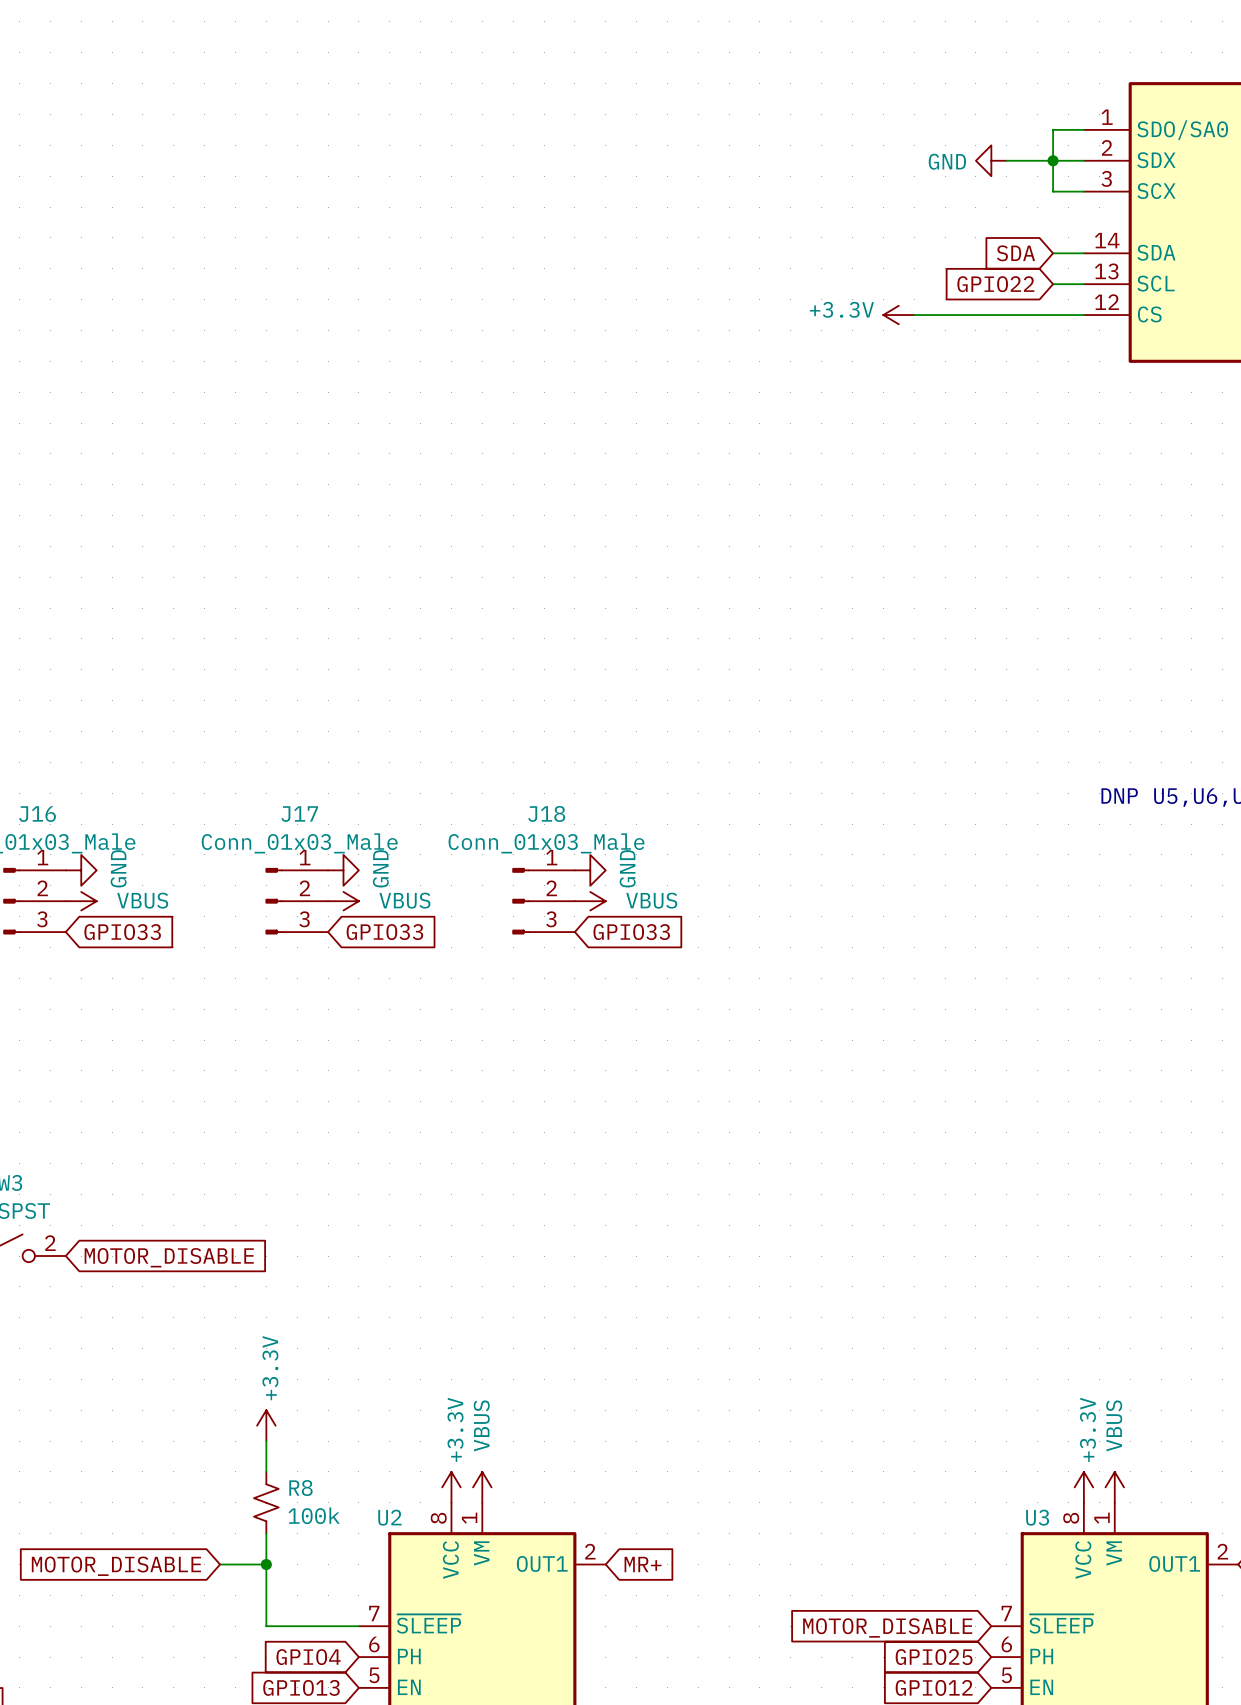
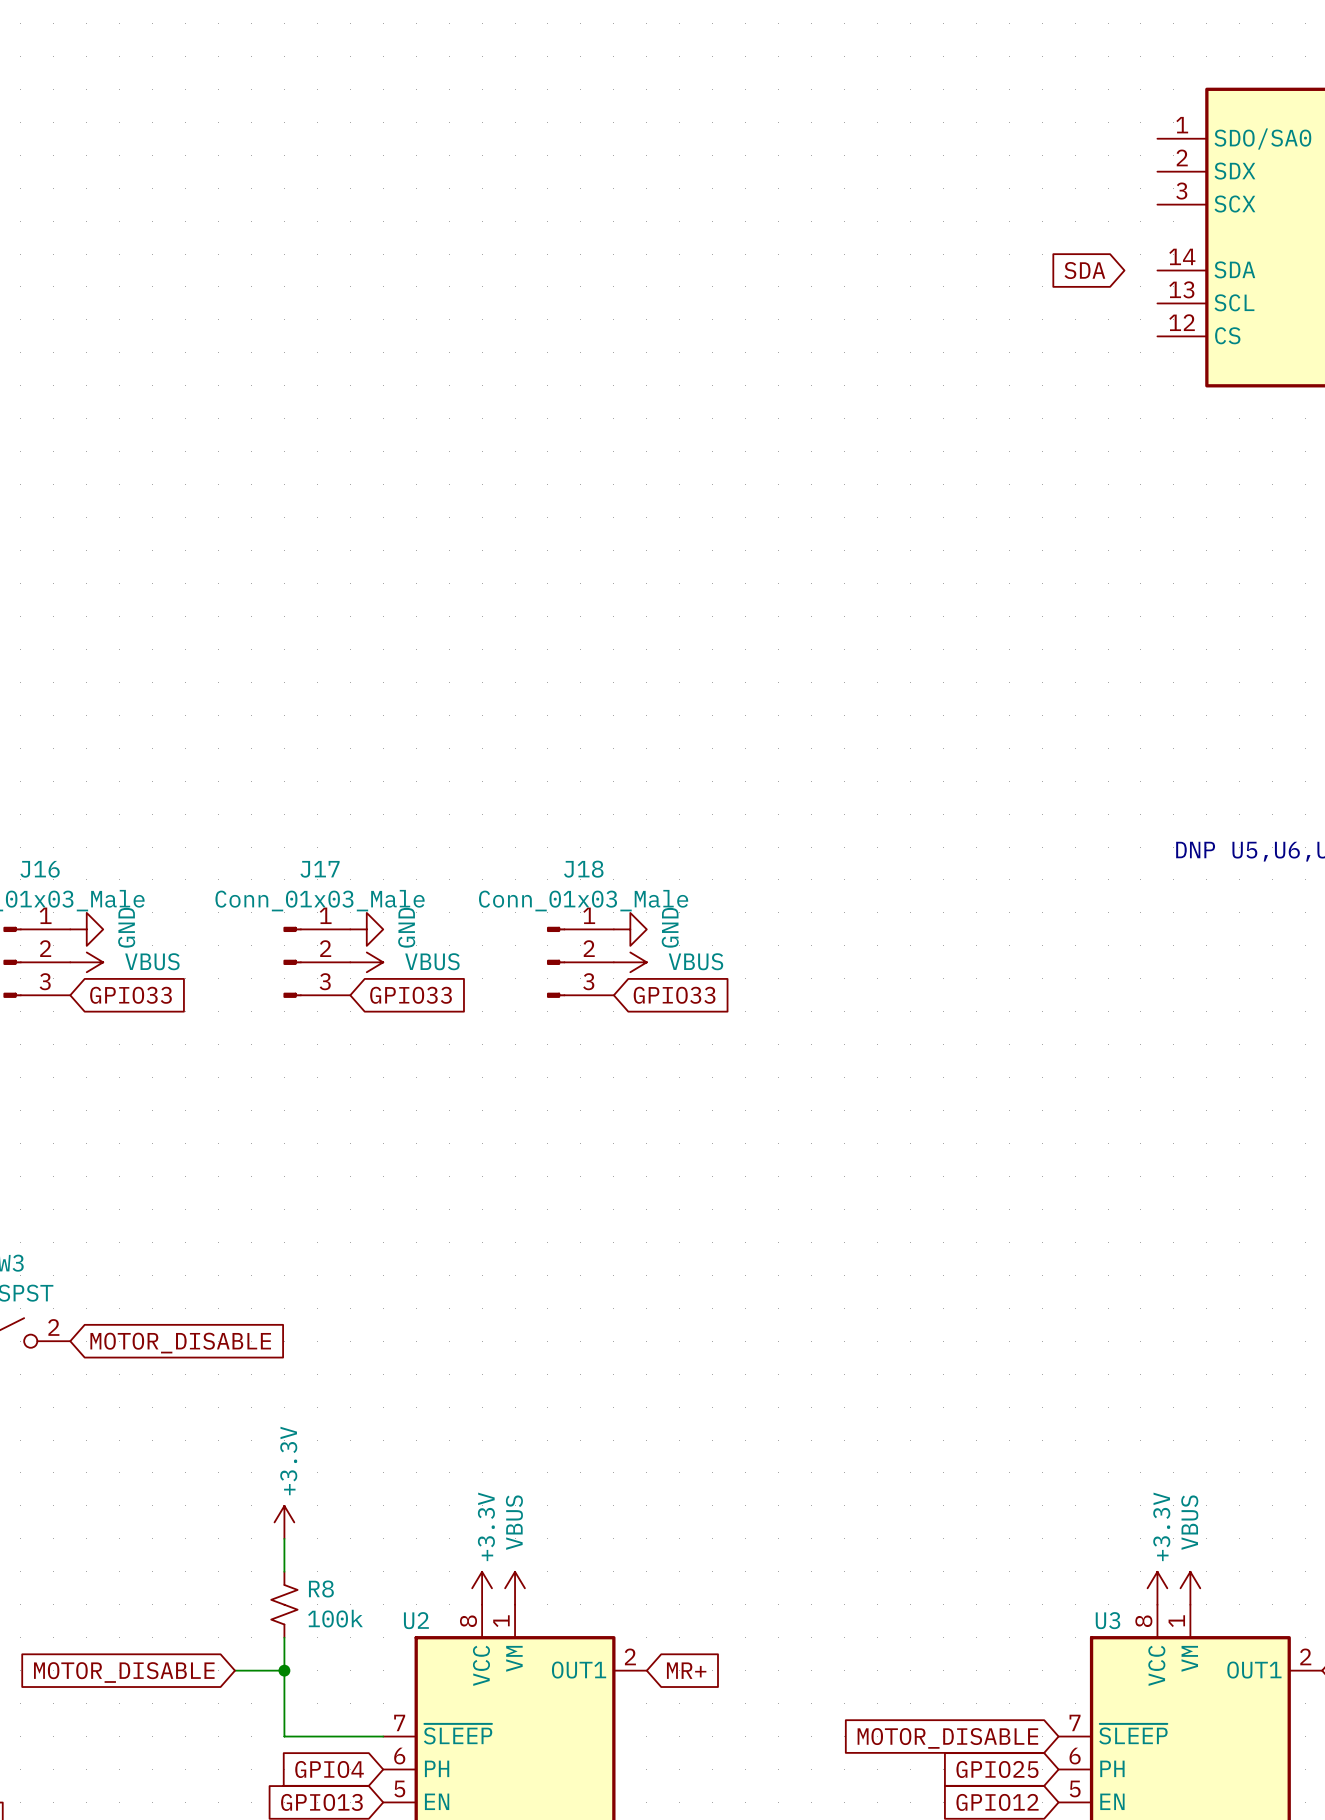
wire: (1083, 129) (1053, 129) (1053, 191) (1083, 191) -> none
power symbol: GND (991, 160) -> none
wire: (1006, 160) (1083, 160) -> none
junction: (1053, 160) -> none
wire: (1053, 253) (1083, 253) -> none
global label: GPIO22 (995, 284) -> none
wire: (1053, 284) (1083, 284) -> none
power symbol: +3.3V (898, 315) -> none
wire: (914, 315) (1083, 315) -> none

